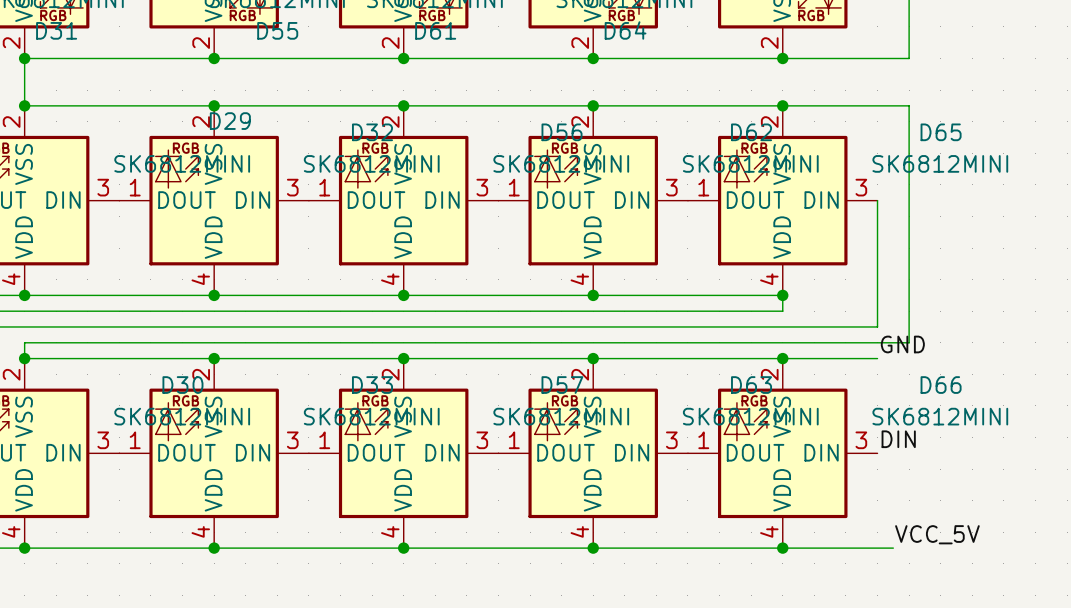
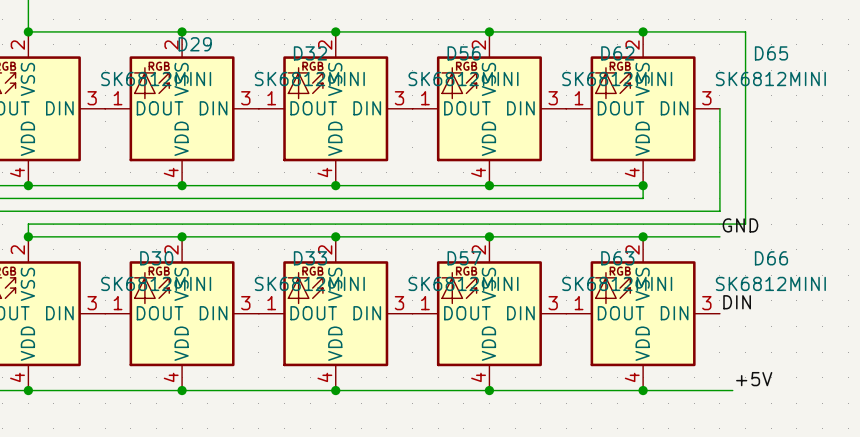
label: VCC_5V (937, 534) -> +5V (754, 379)

